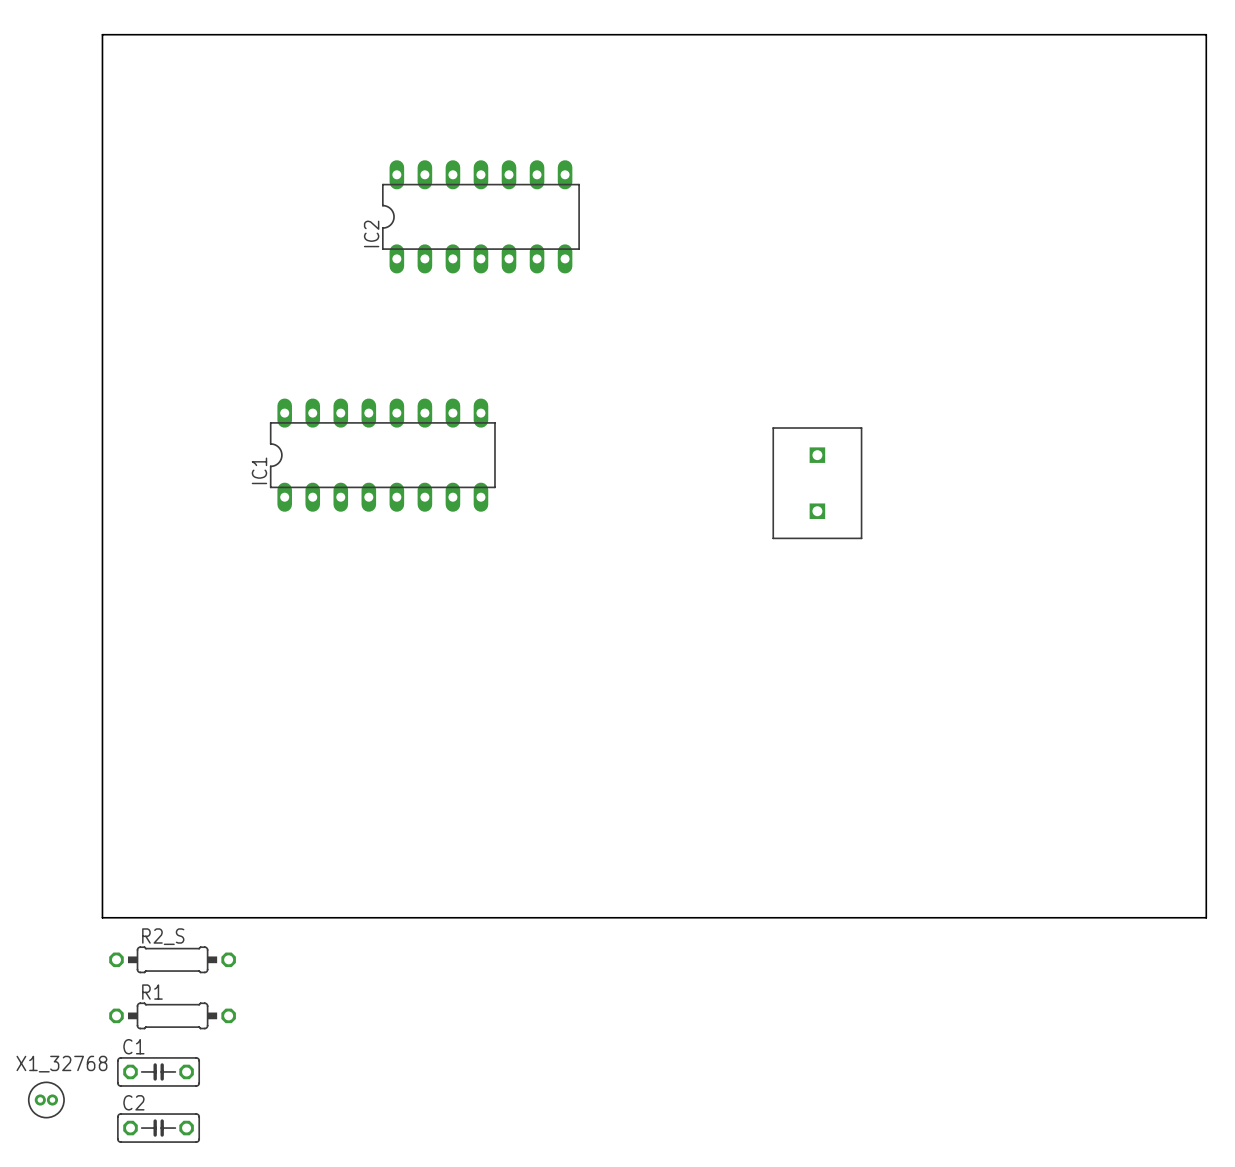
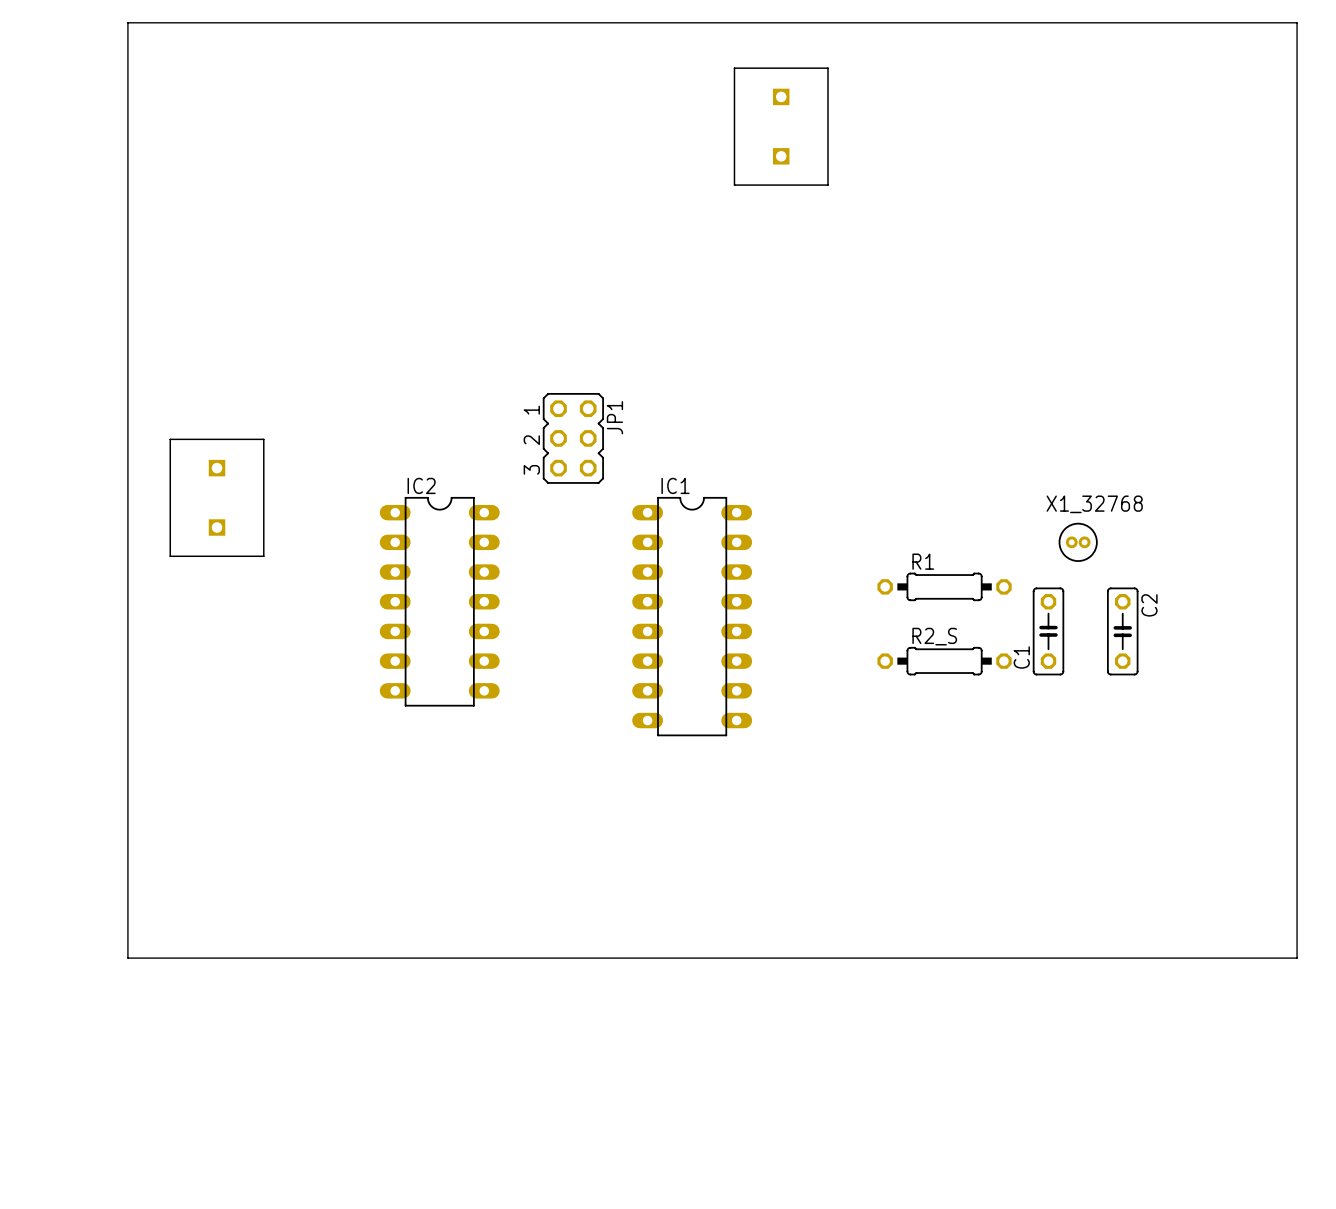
part: none -> (781, 126)
IC2 rotation: 0° (480, 216) -> 90° clockwise (439, 601)
IC2 position: (480, 216) -> (439, 601)
JP1: none -> (573, 438)
IC1 rotation: 0° (382, 455) -> 90° clockwise (692, 616)
IC1 position: (382, 455) -> (692, 616)
part: none -> (217, 497)
part: (817, 483) -> none
R2_S position: (172, 959) -> (944, 661)
R1 position: (172, 1015) -> (944, 586)
C1 rotation: 0° (158, 1071) -> 90° counterclockwise (1048, 631)
C1 position: (158, 1071) -> (1048, 631)
X1_32768 position: (46, 1100) -> (1078, 542)
C2 rotation: 0° (158, 1128) -> 90° clockwise (1122, 631)
C2 position: (158, 1128) -> (1122, 631)

